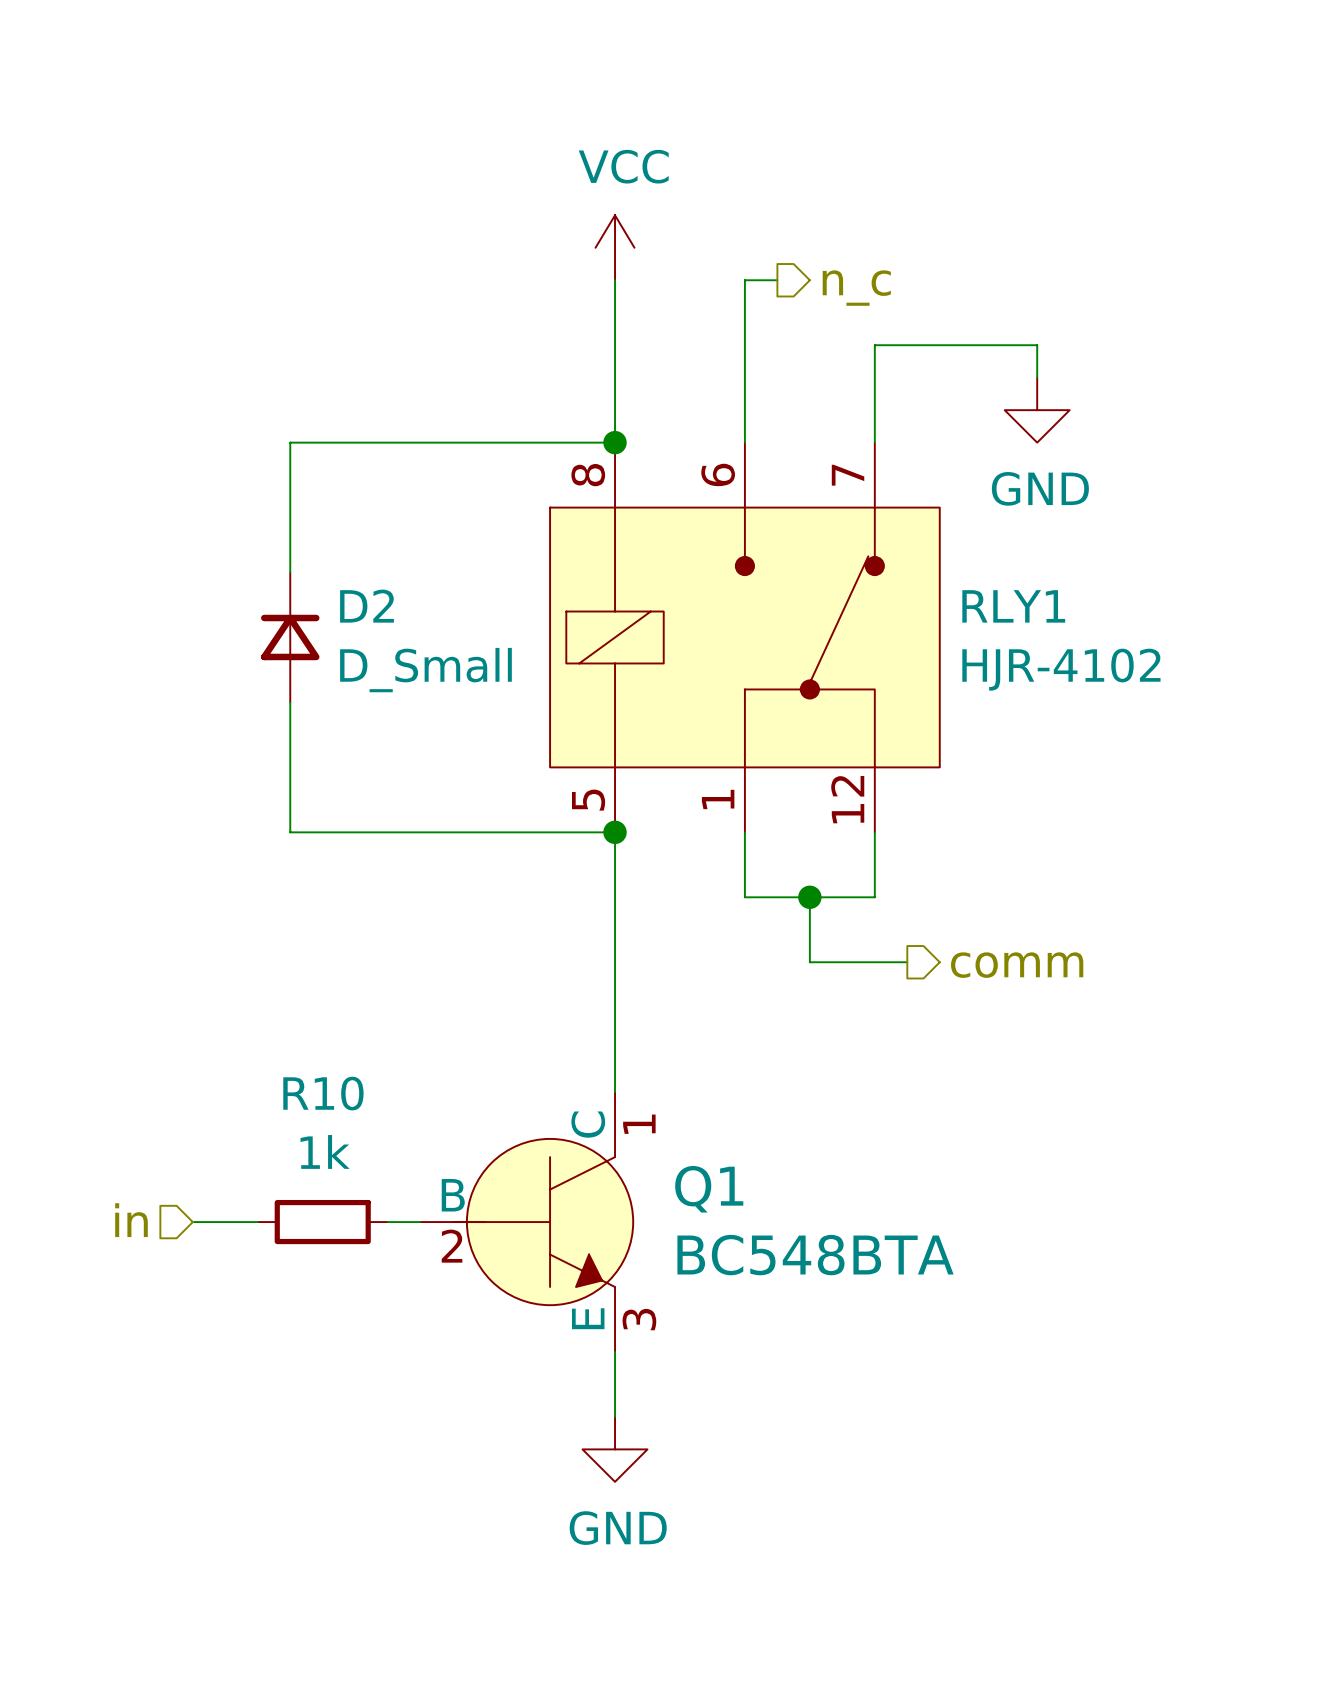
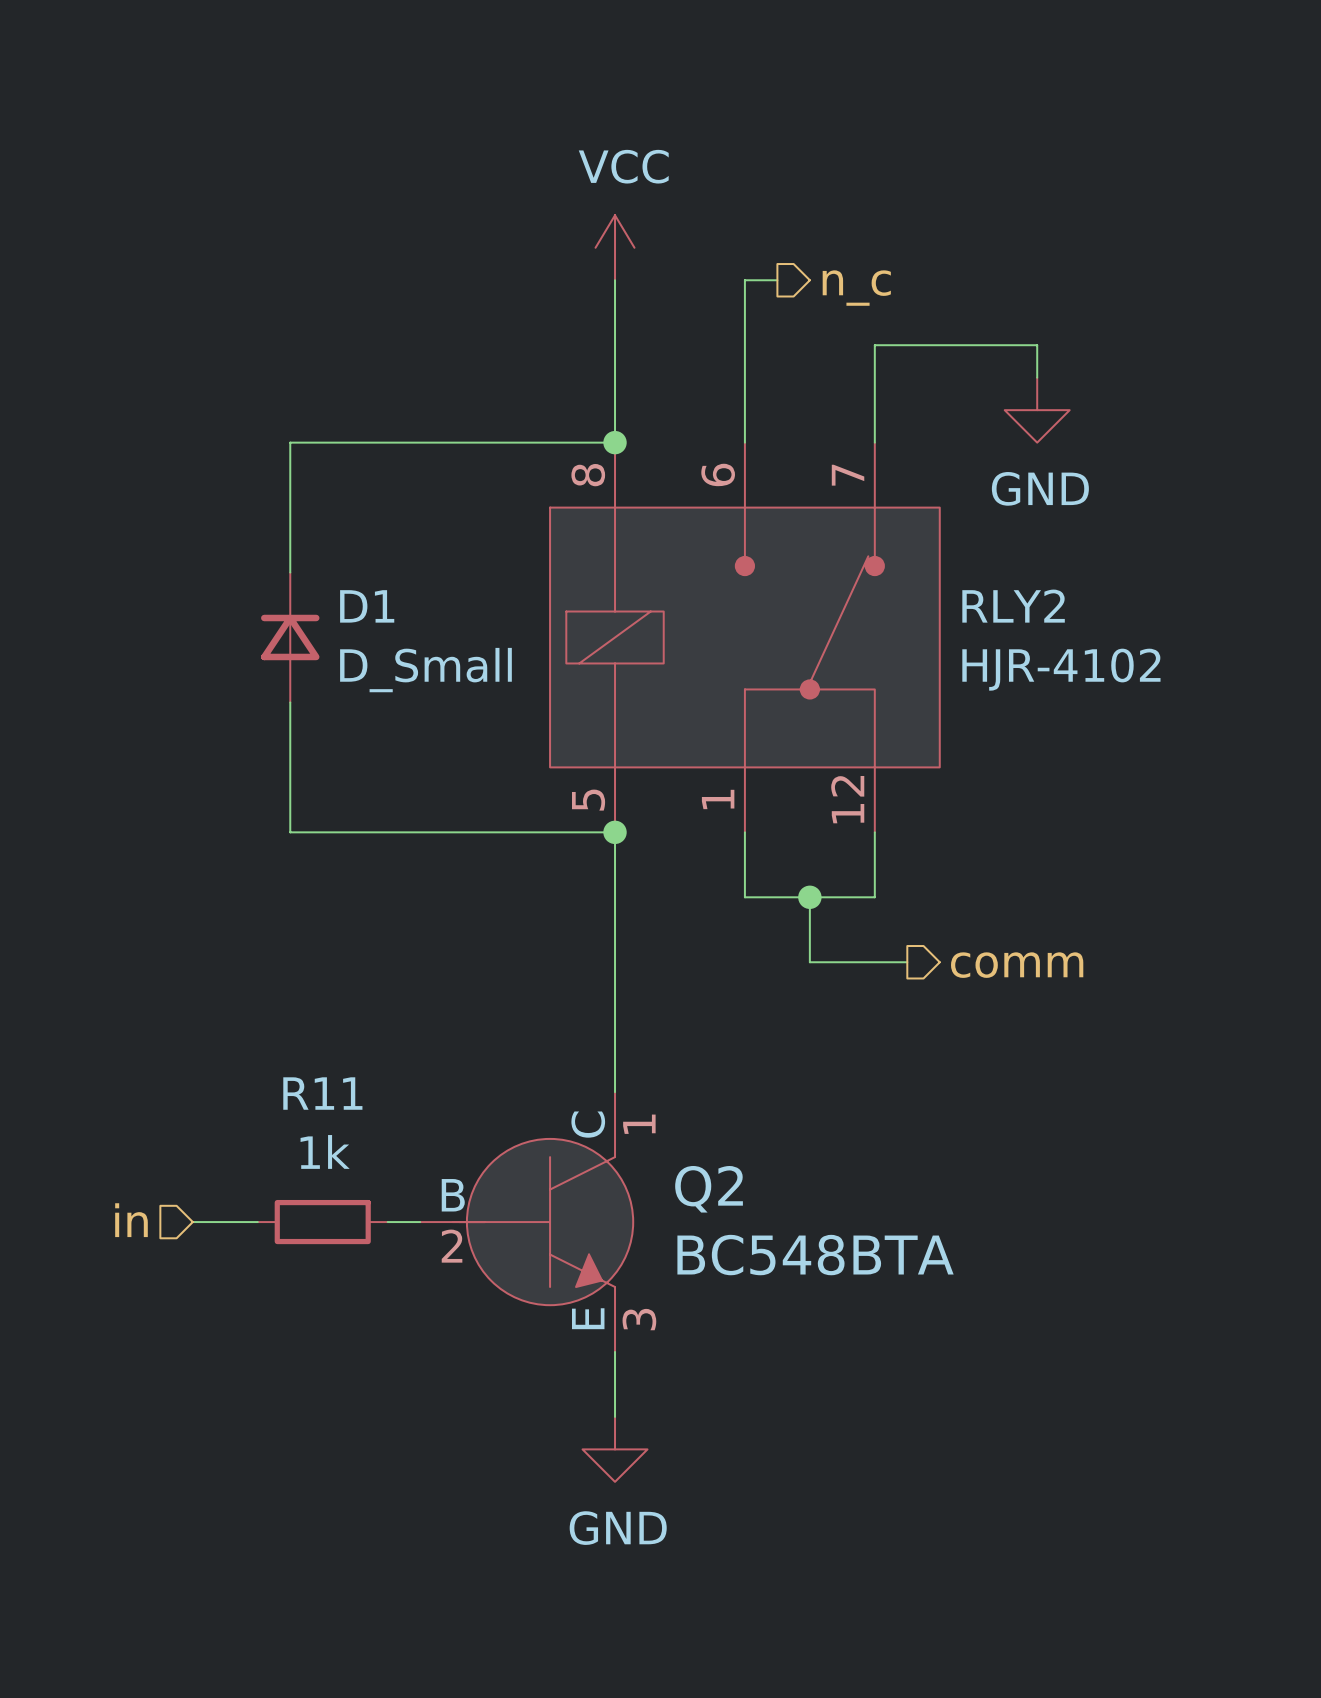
D2 name: D2 (367, 606) -> D1 (367, 606)
RLY1 name: RLY1 (1013, 606) -> RLY2 (1013, 606)
R10 name: R10 (323, 1093) -> R11 (322, 1093)
Q1 name: Q1 (709, 1189) -> Q2 (709, 1189)

